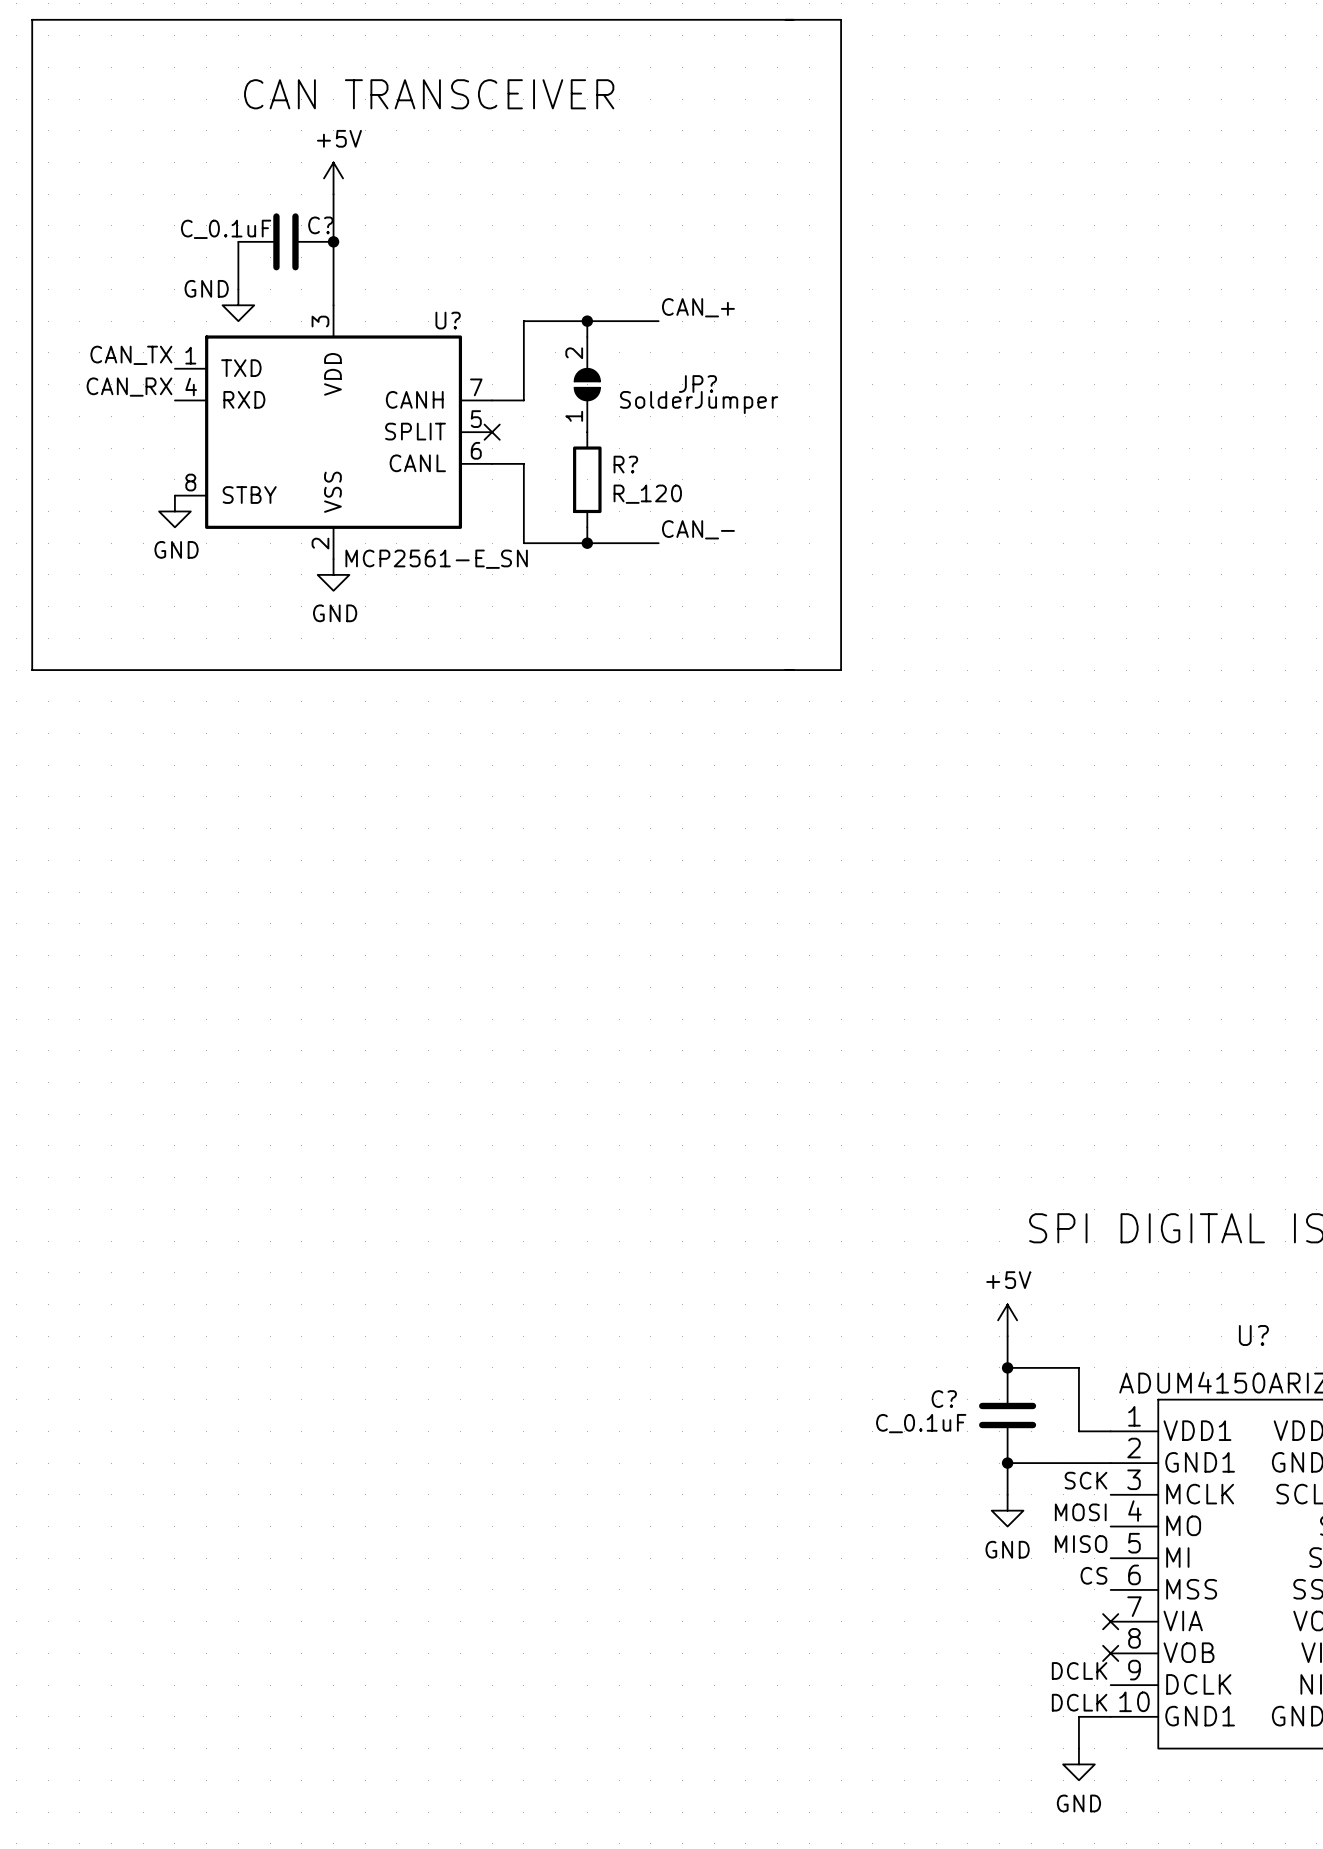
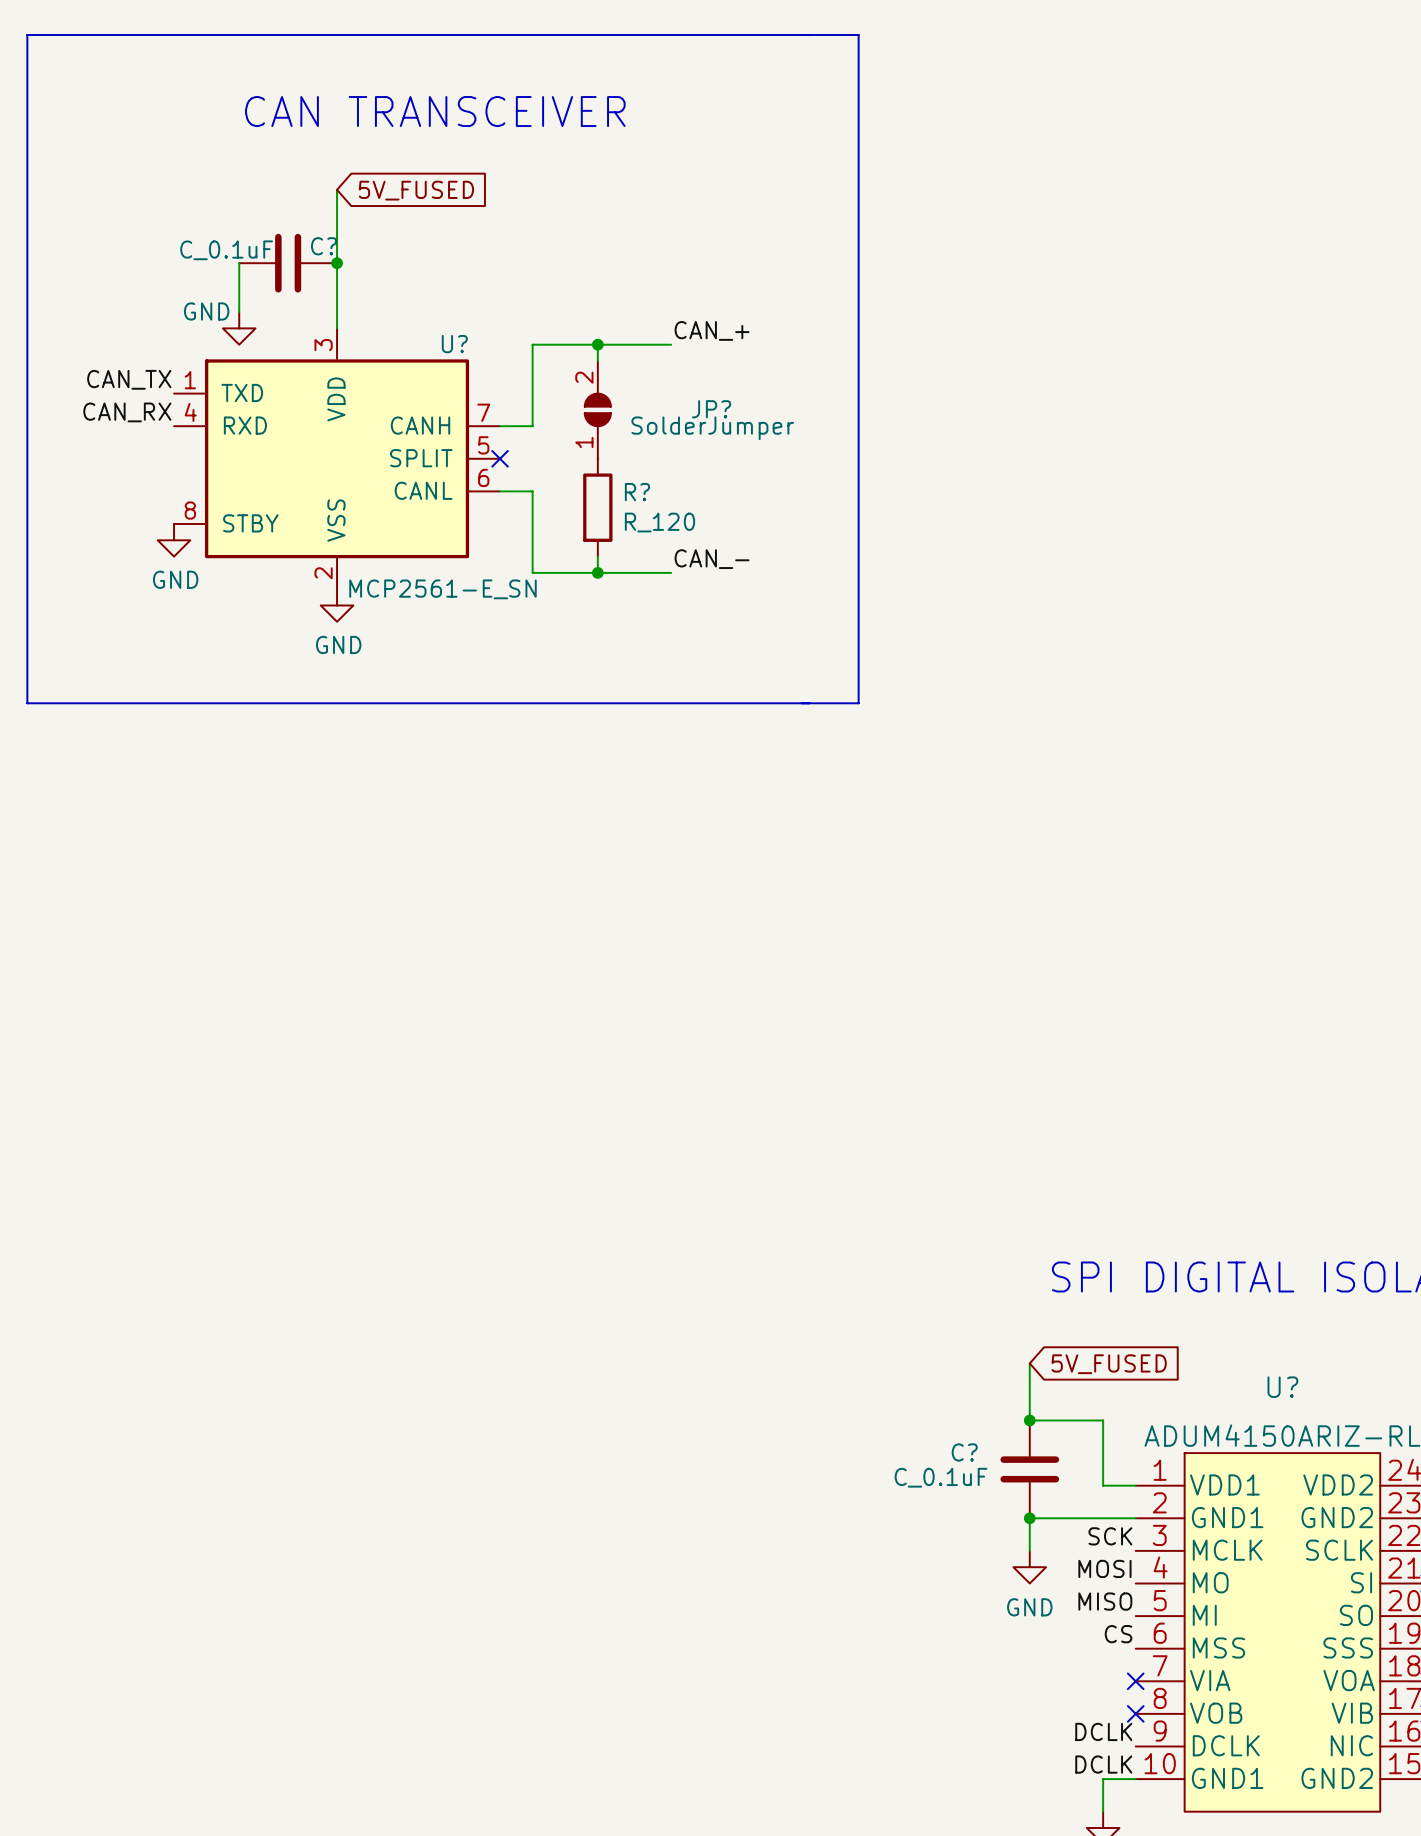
global label: none -> 5V_FUSED (416, 190)
power symbol: +5V (333, 178) -> none
global label: none -> 5V_FUSED (1109, 1364)
power symbol: +5V (1007, 1320) -> none

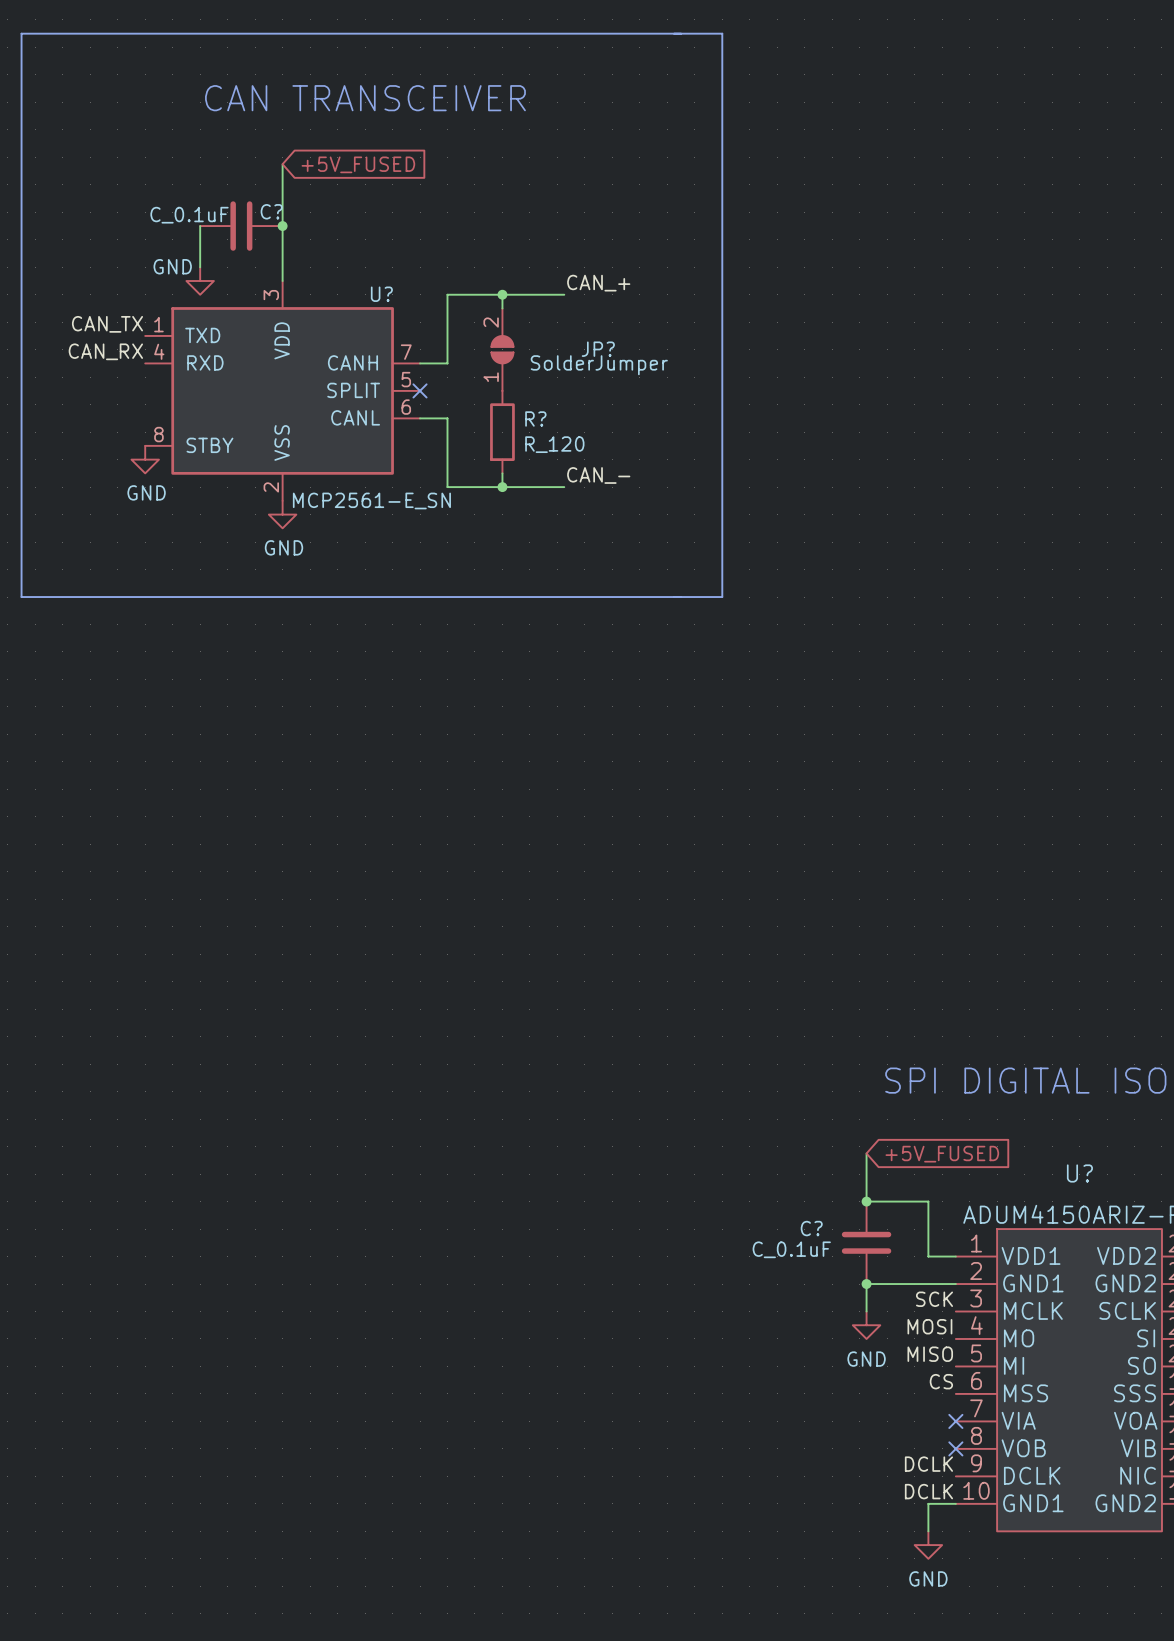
global label: 5V_FUSED (416, 190) -> +5V_FUSED (358, 164)
global label: 5V_FUSED (1109, 1364) -> +5V_FUSED (942, 1154)

